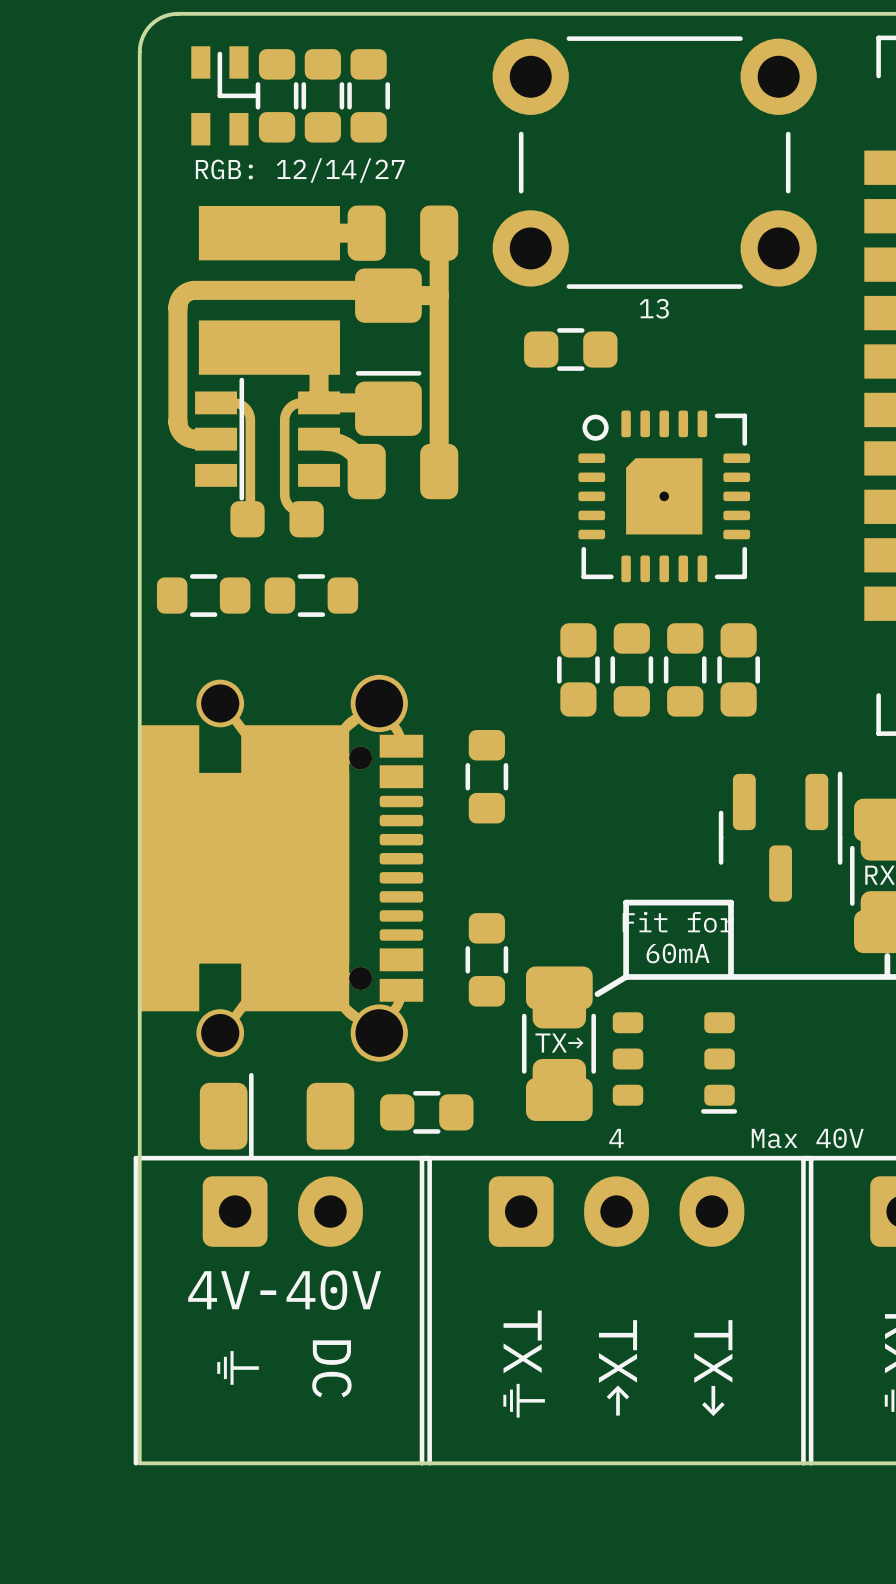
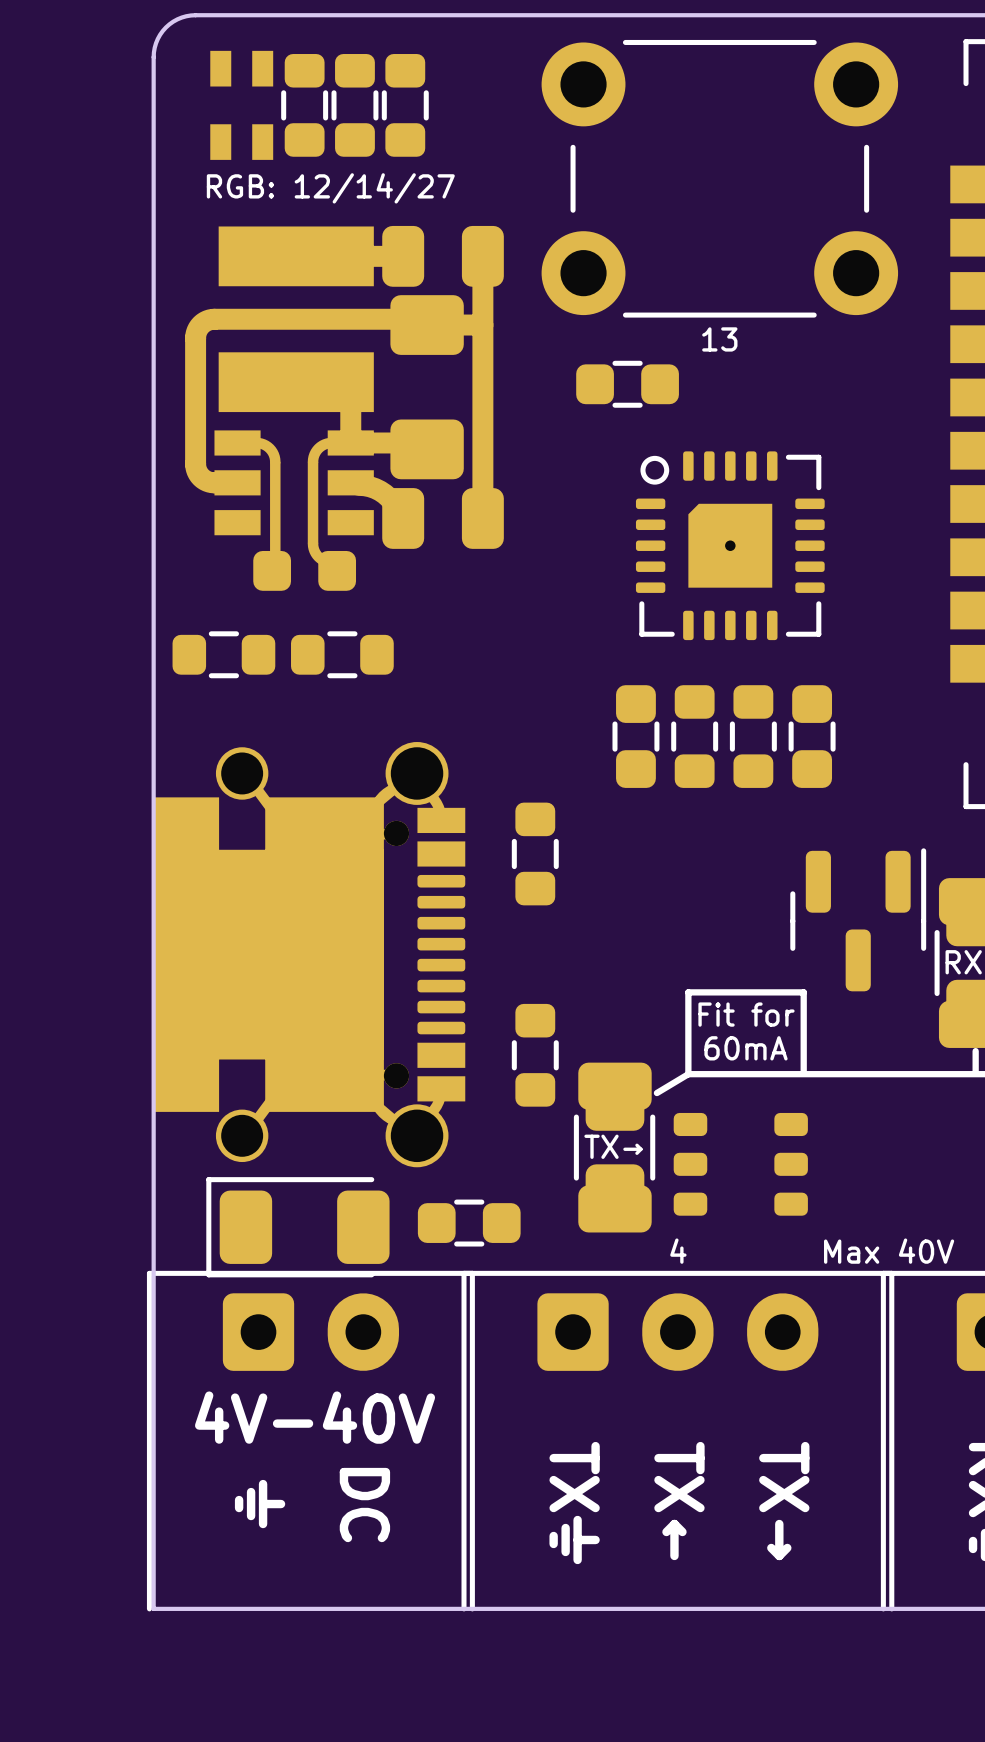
part footprint: [191, 46, 261, 146] -> [210, 50, 274, 160]
part footprint: [168, 205, 459, 538] -> [185, 225, 504, 591]
part footprint: [612, 1012, 738, 1114] -> [673, 1112, 808, 1216]
part footprint: [199, 1072, 355, 1160] -> [206, 1177, 390, 1278]

